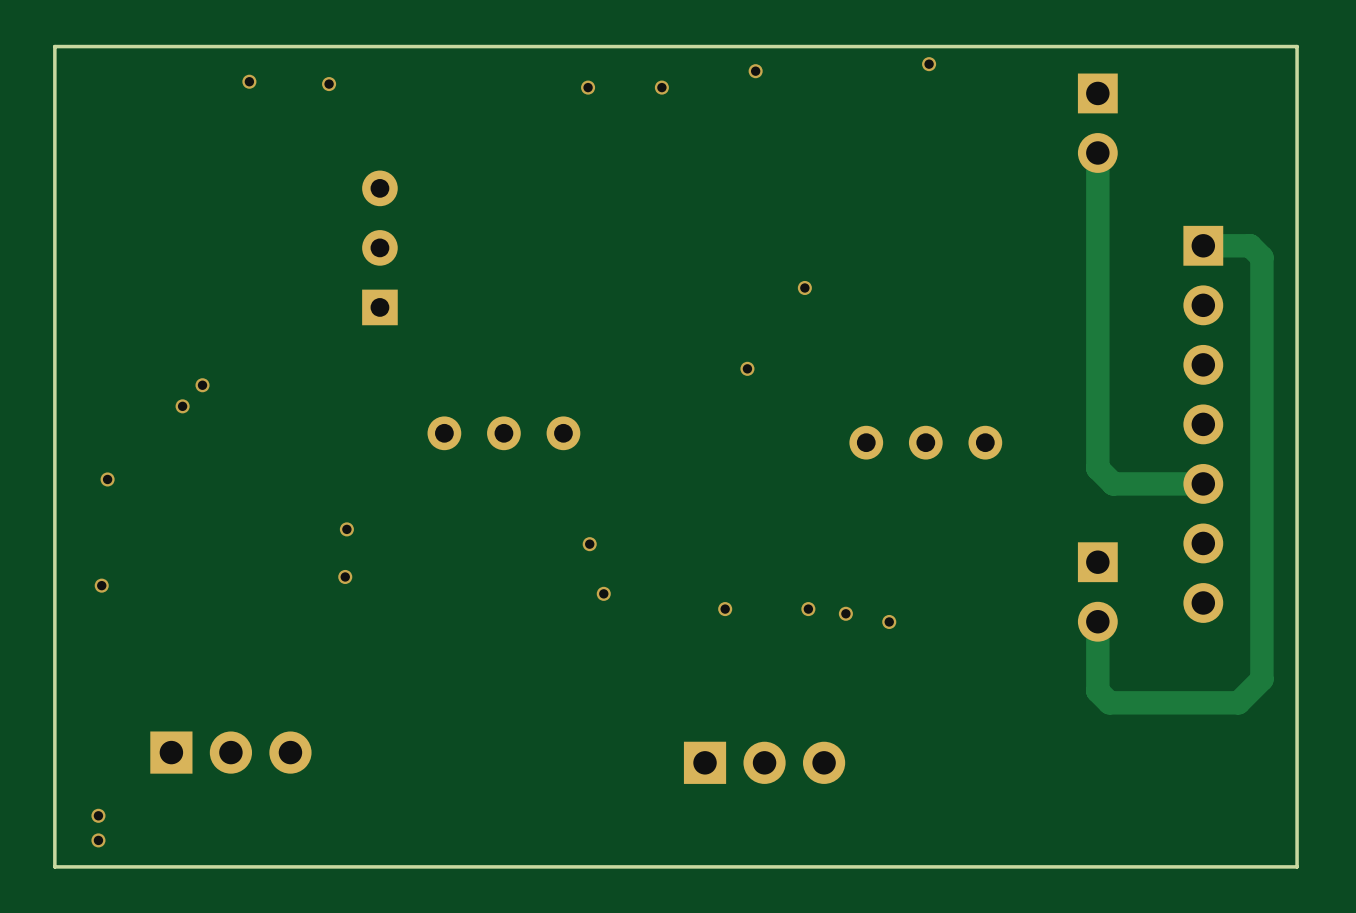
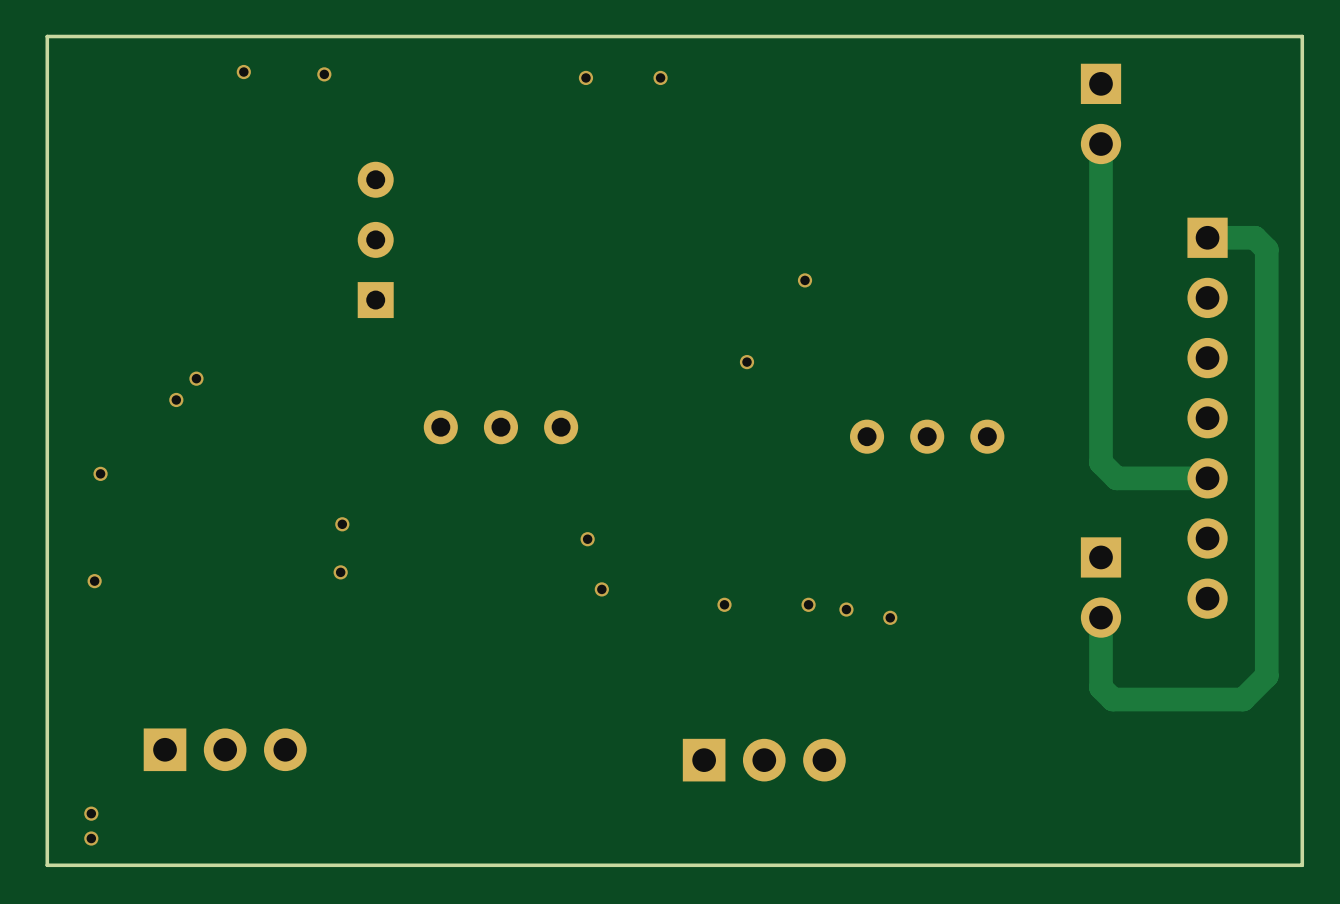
via: (929, 64) -> none
via: (755, 71) -> none

